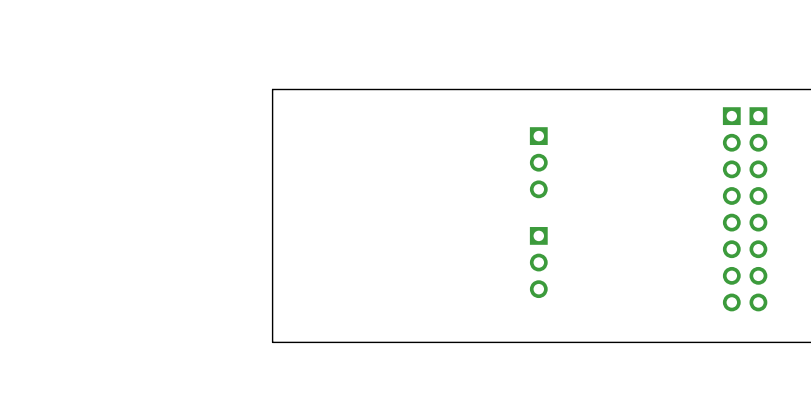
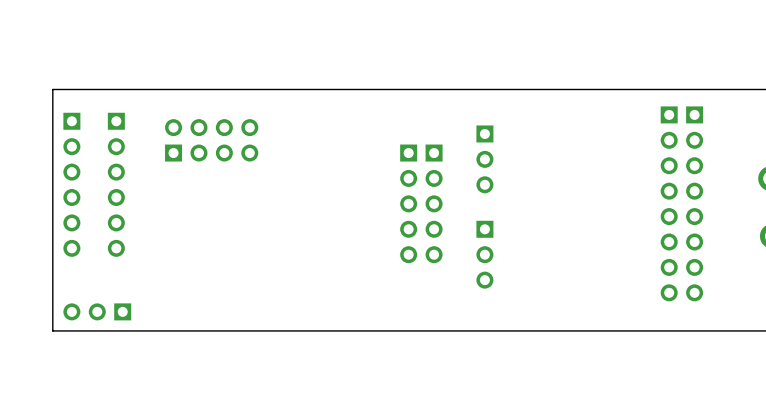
board edge: (272, 89) (272, 342) -> (230, 89) (52, 89) (52, 330) (230, 330)
part: none -> (211, 140)
part: none -> (71, 184)
part: none -> (116, 184)
part: none -> (408, 203)
part: none -> (434, 203)
part: none -> (97, 311)

